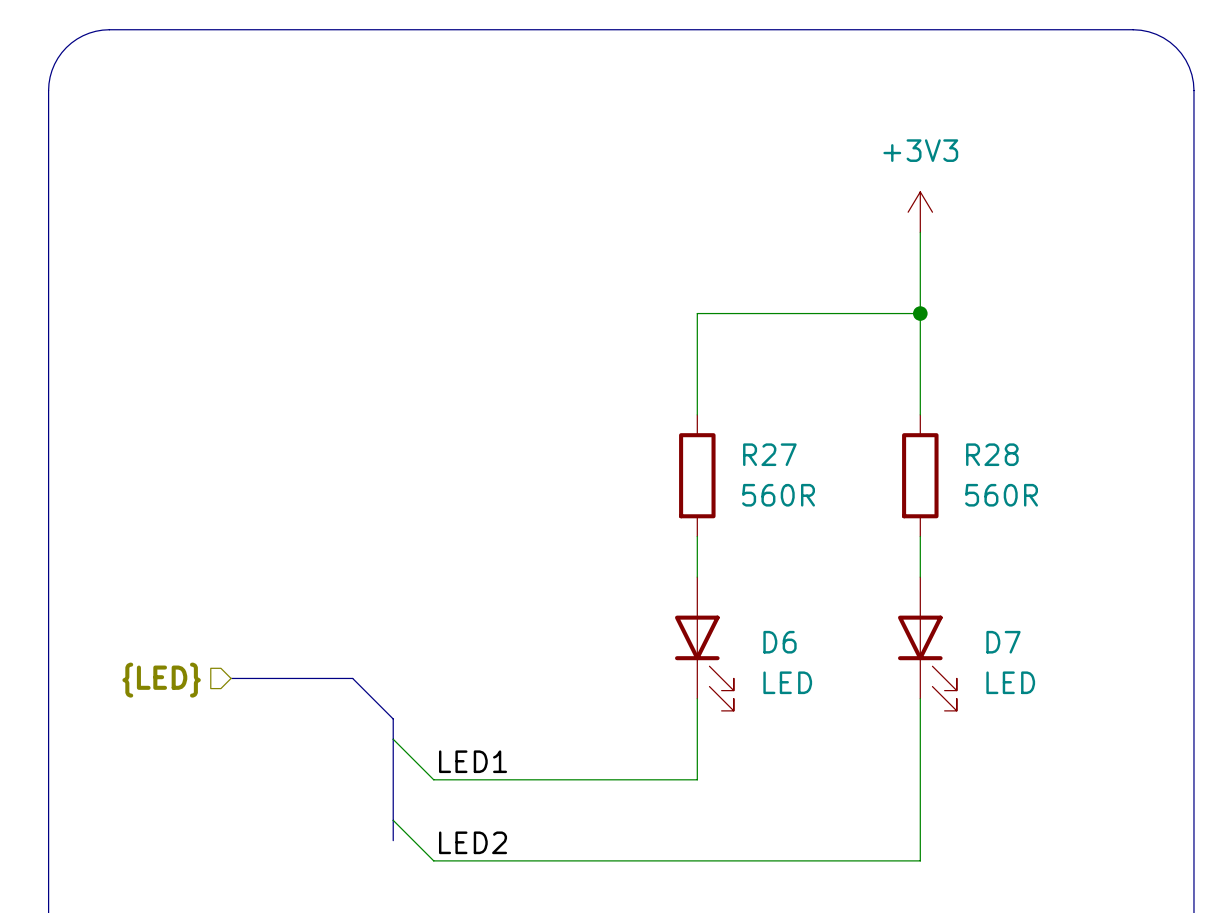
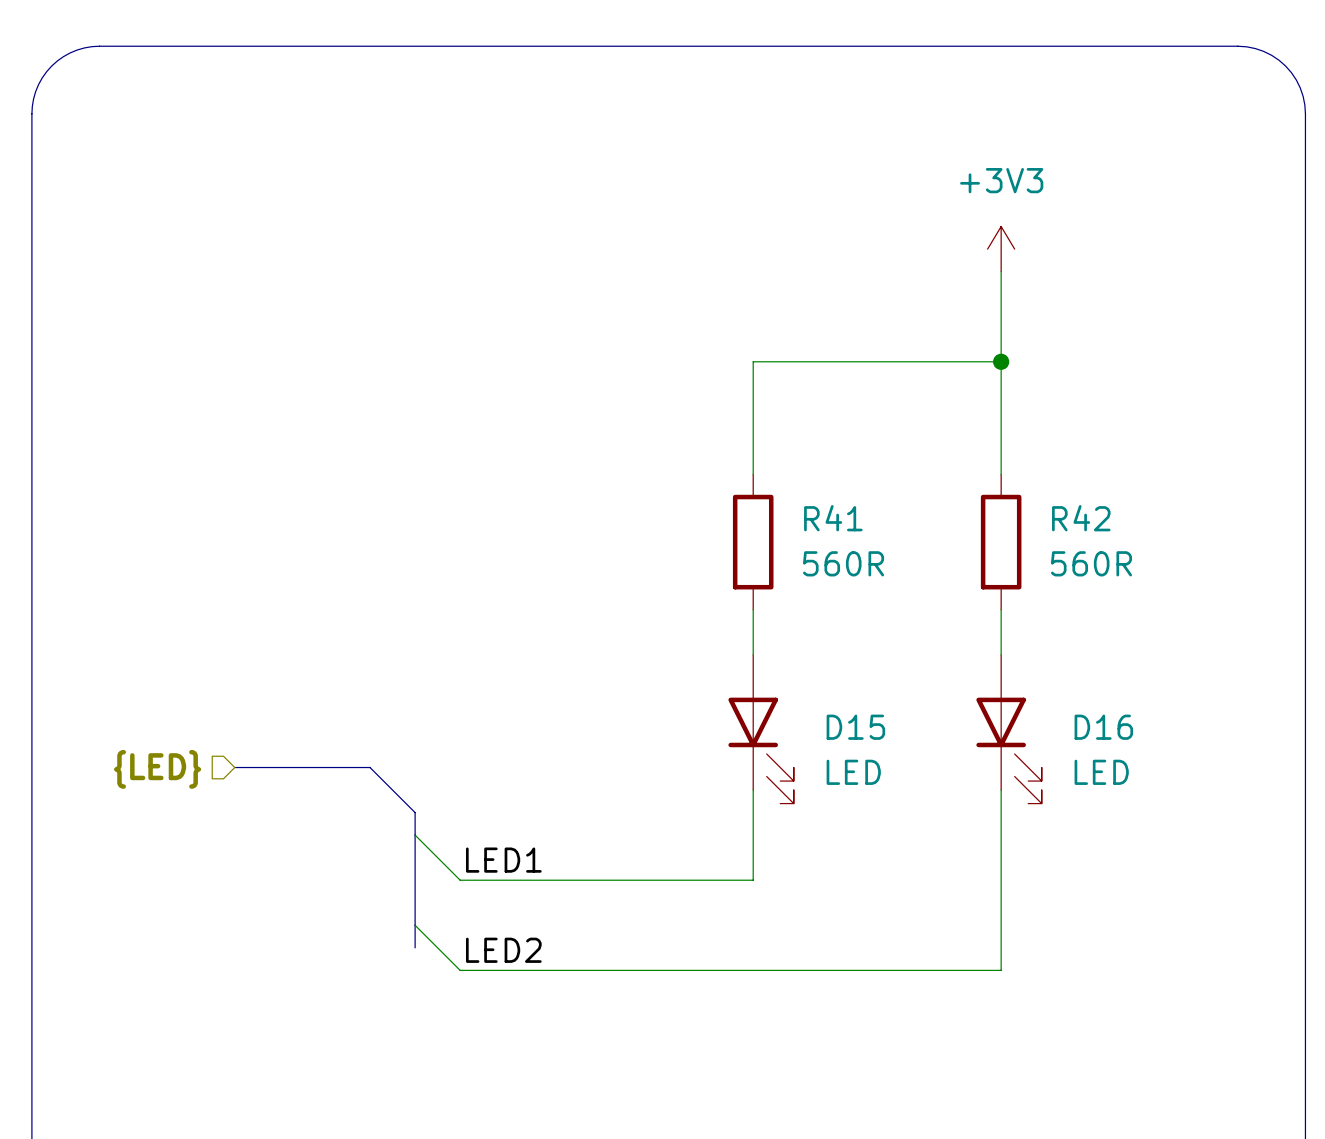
R27 name: R27 (769, 454) -> R41 (833, 518)
R28 name: R28 (992, 454) -> R42 (1081, 518)
D6 name: D6 (780, 642) -> D15 (855, 727)
D7 name: D7 (1003, 642) -> D16 (1103, 727)

